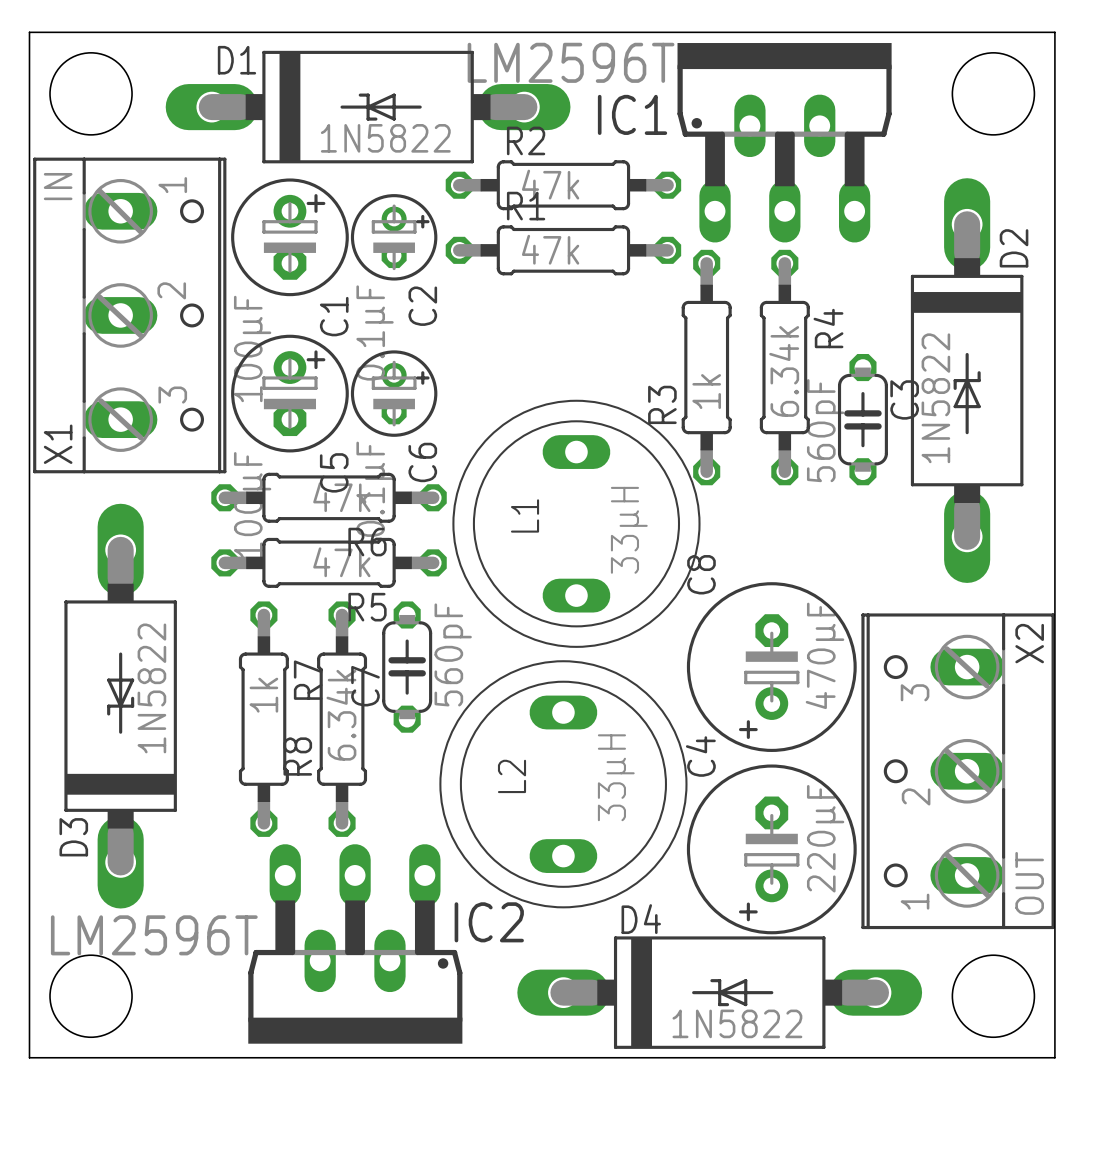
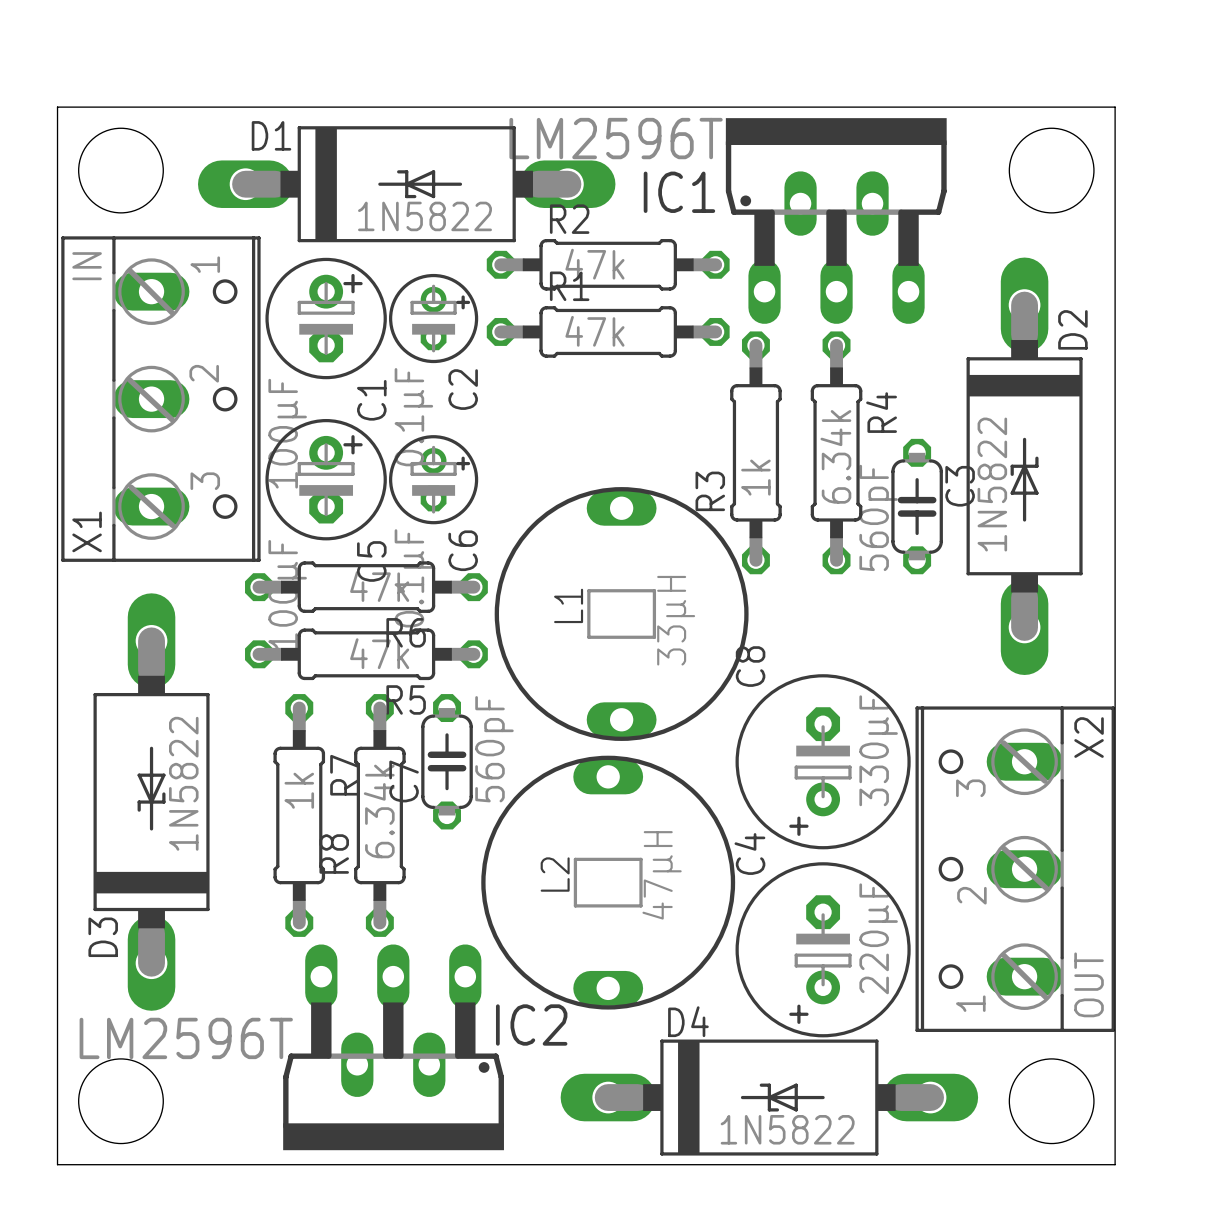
L1 footprint: [452, 399, 701, 648] -> [494, 487, 749, 741]
C8 value: 470µF (825, 655) -> 330µF (878, 750)
L2 footprint: [439, 660, 688, 909] -> [481, 755, 736, 1010]
L2 value: 33µH (616, 777) -> 47µH (662, 875)

